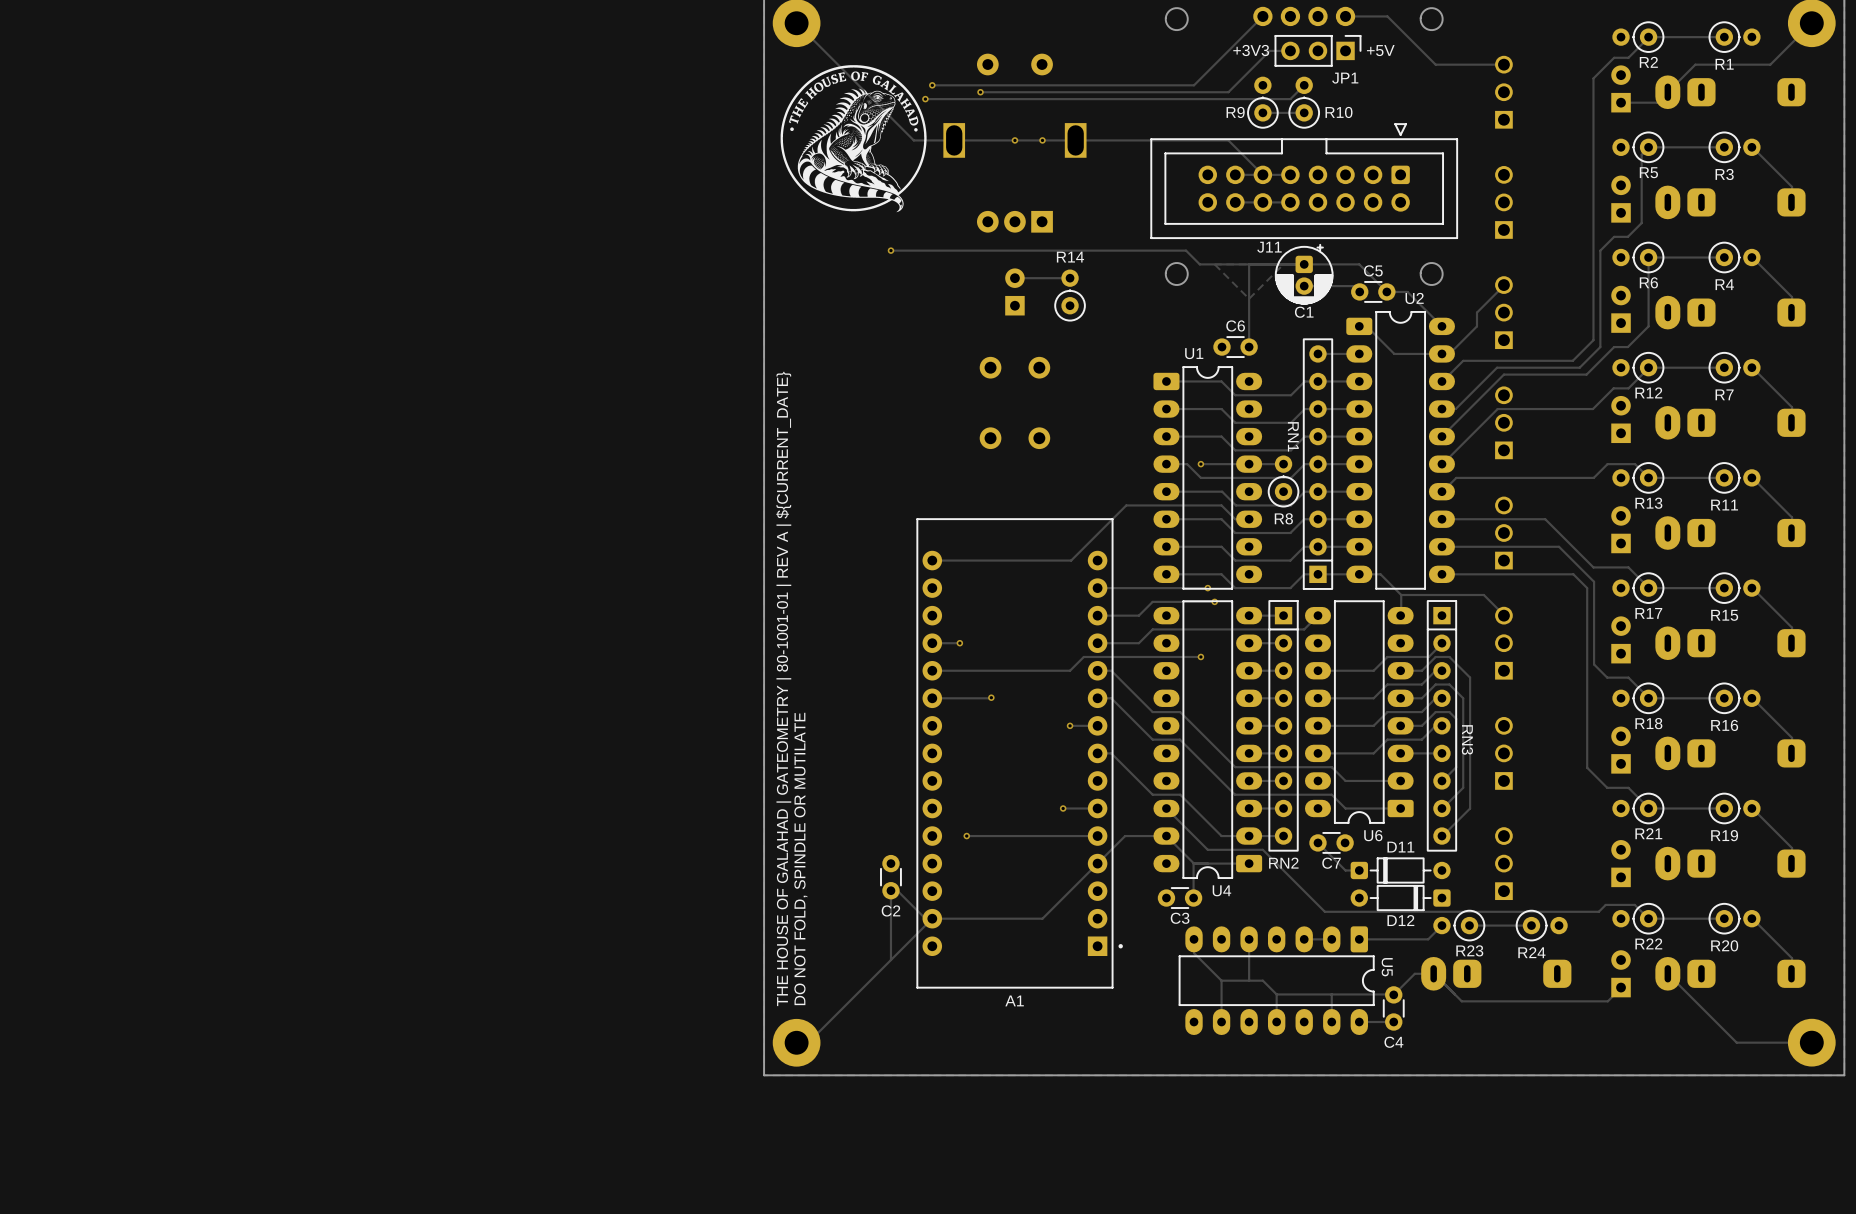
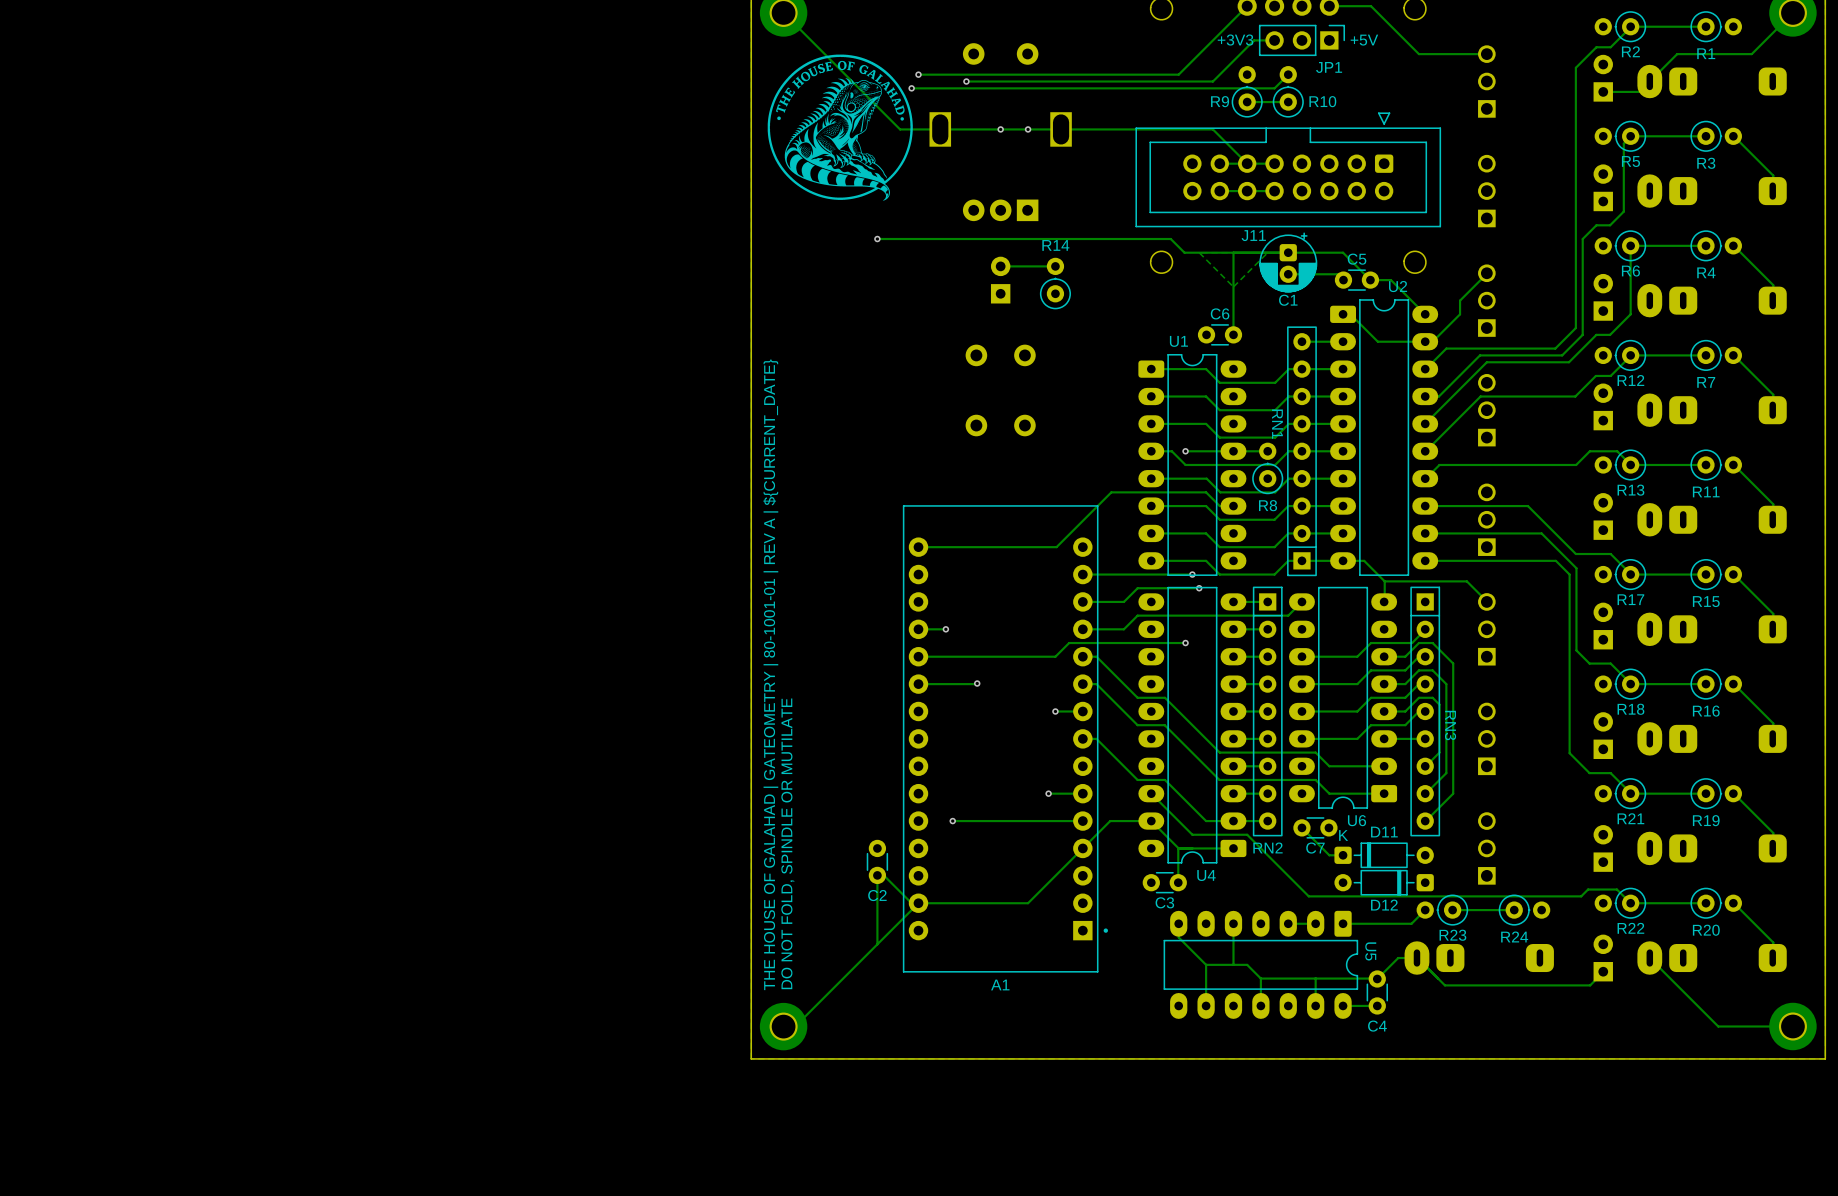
D11 text: none -> K (1343, 835)

